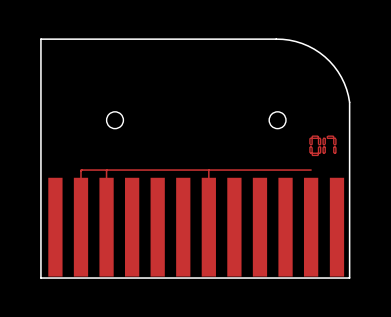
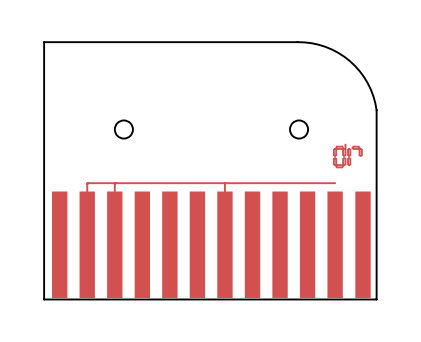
zone outline: (333, 146) (335, 146) (335, 153) (333, 153) (333, 146) -> none

